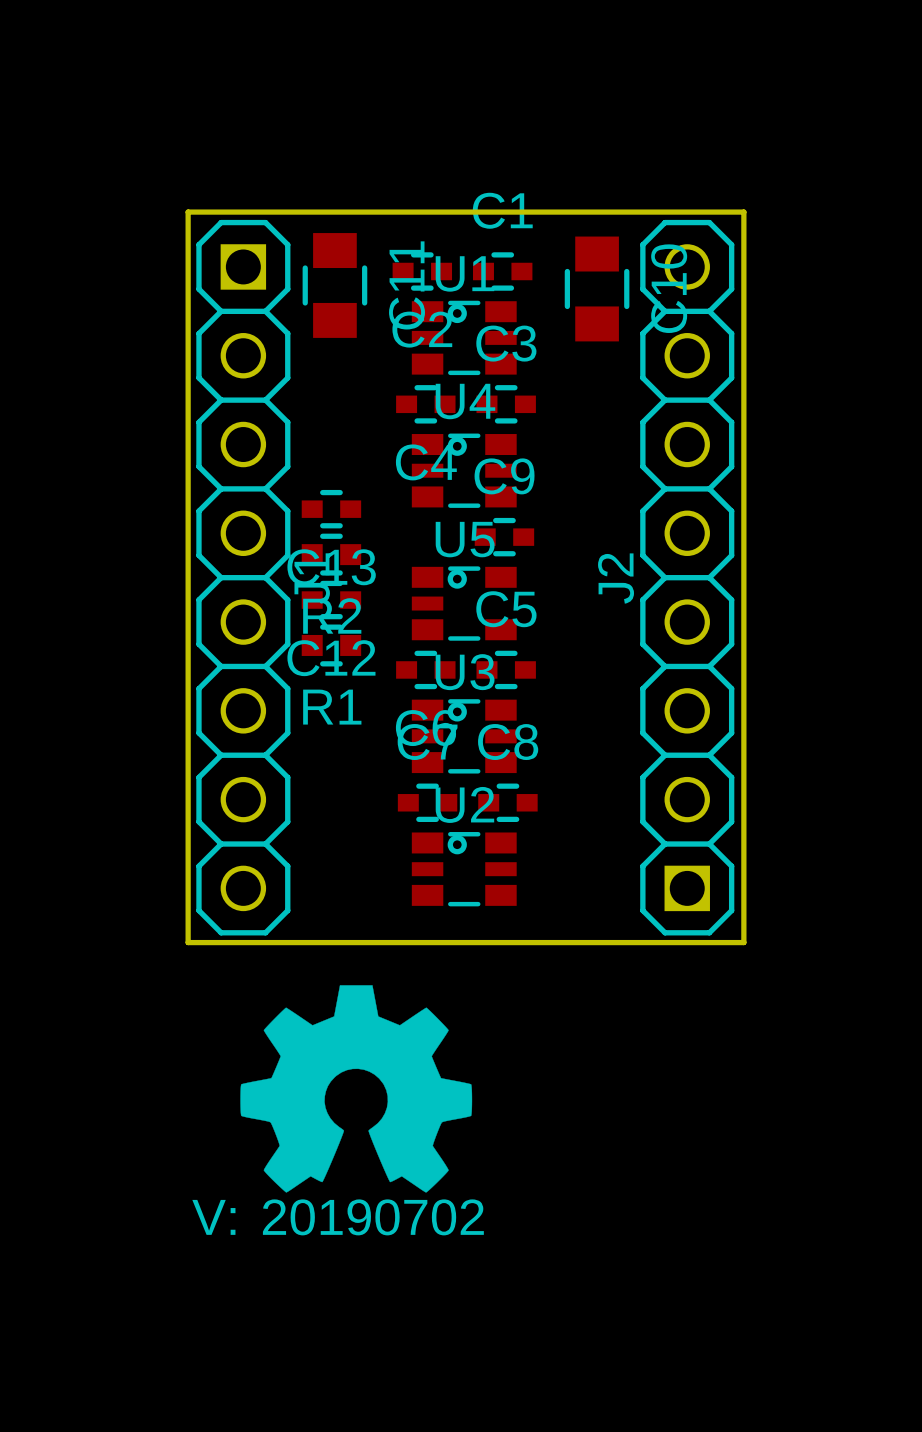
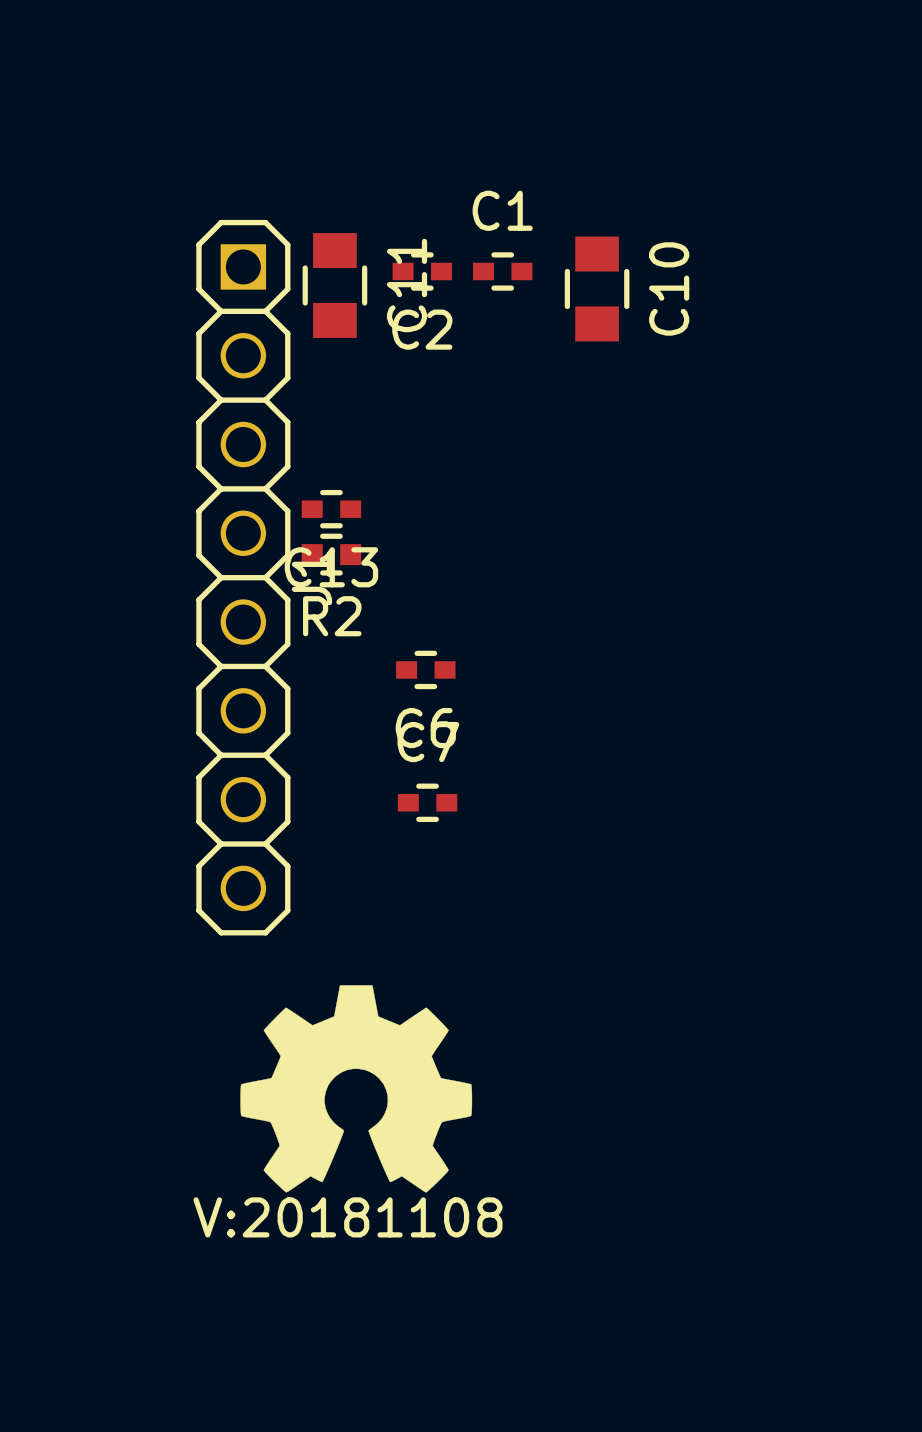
board edge: (188, 212) (188, 942) (743, 942) (743, 212) (188, 212) -> none
U1: (464, 337) -> none
C4: (425, 404) -> none
C3: (506, 404) -> none
U4: (464, 470) -> none
C9: (504, 537) -> none
J2: (687, 577) -> none
C12: (331, 600) -> none
U5: (464, 603) -> none
R1: (331, 645) -> none
C5: (506, 669) -> none
U3: (464, 736) -> none
C8: (507, 802) -> none
U2: (464, 869) -> none
drawing shape: [192, 1199, 484, 1236] -> [193, 1197, 503, 1238]

